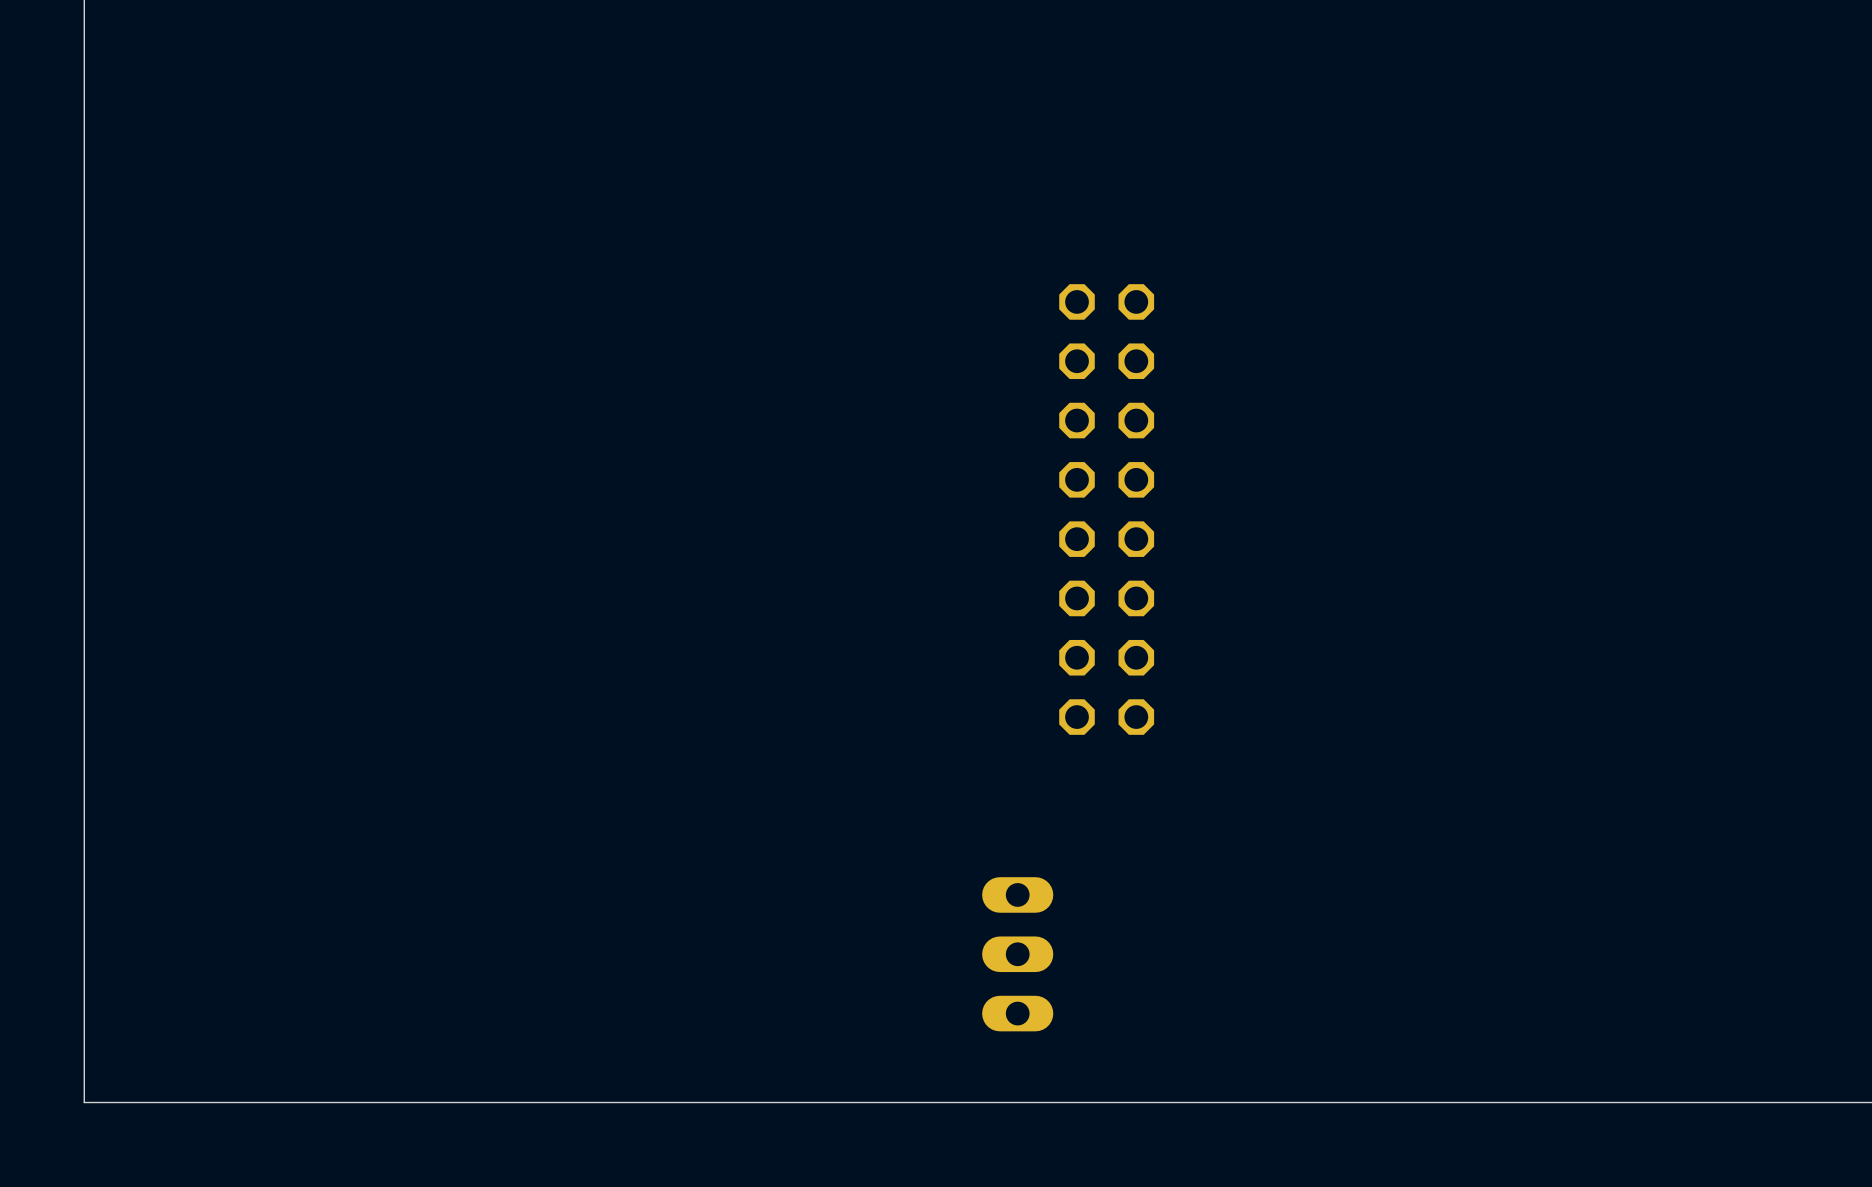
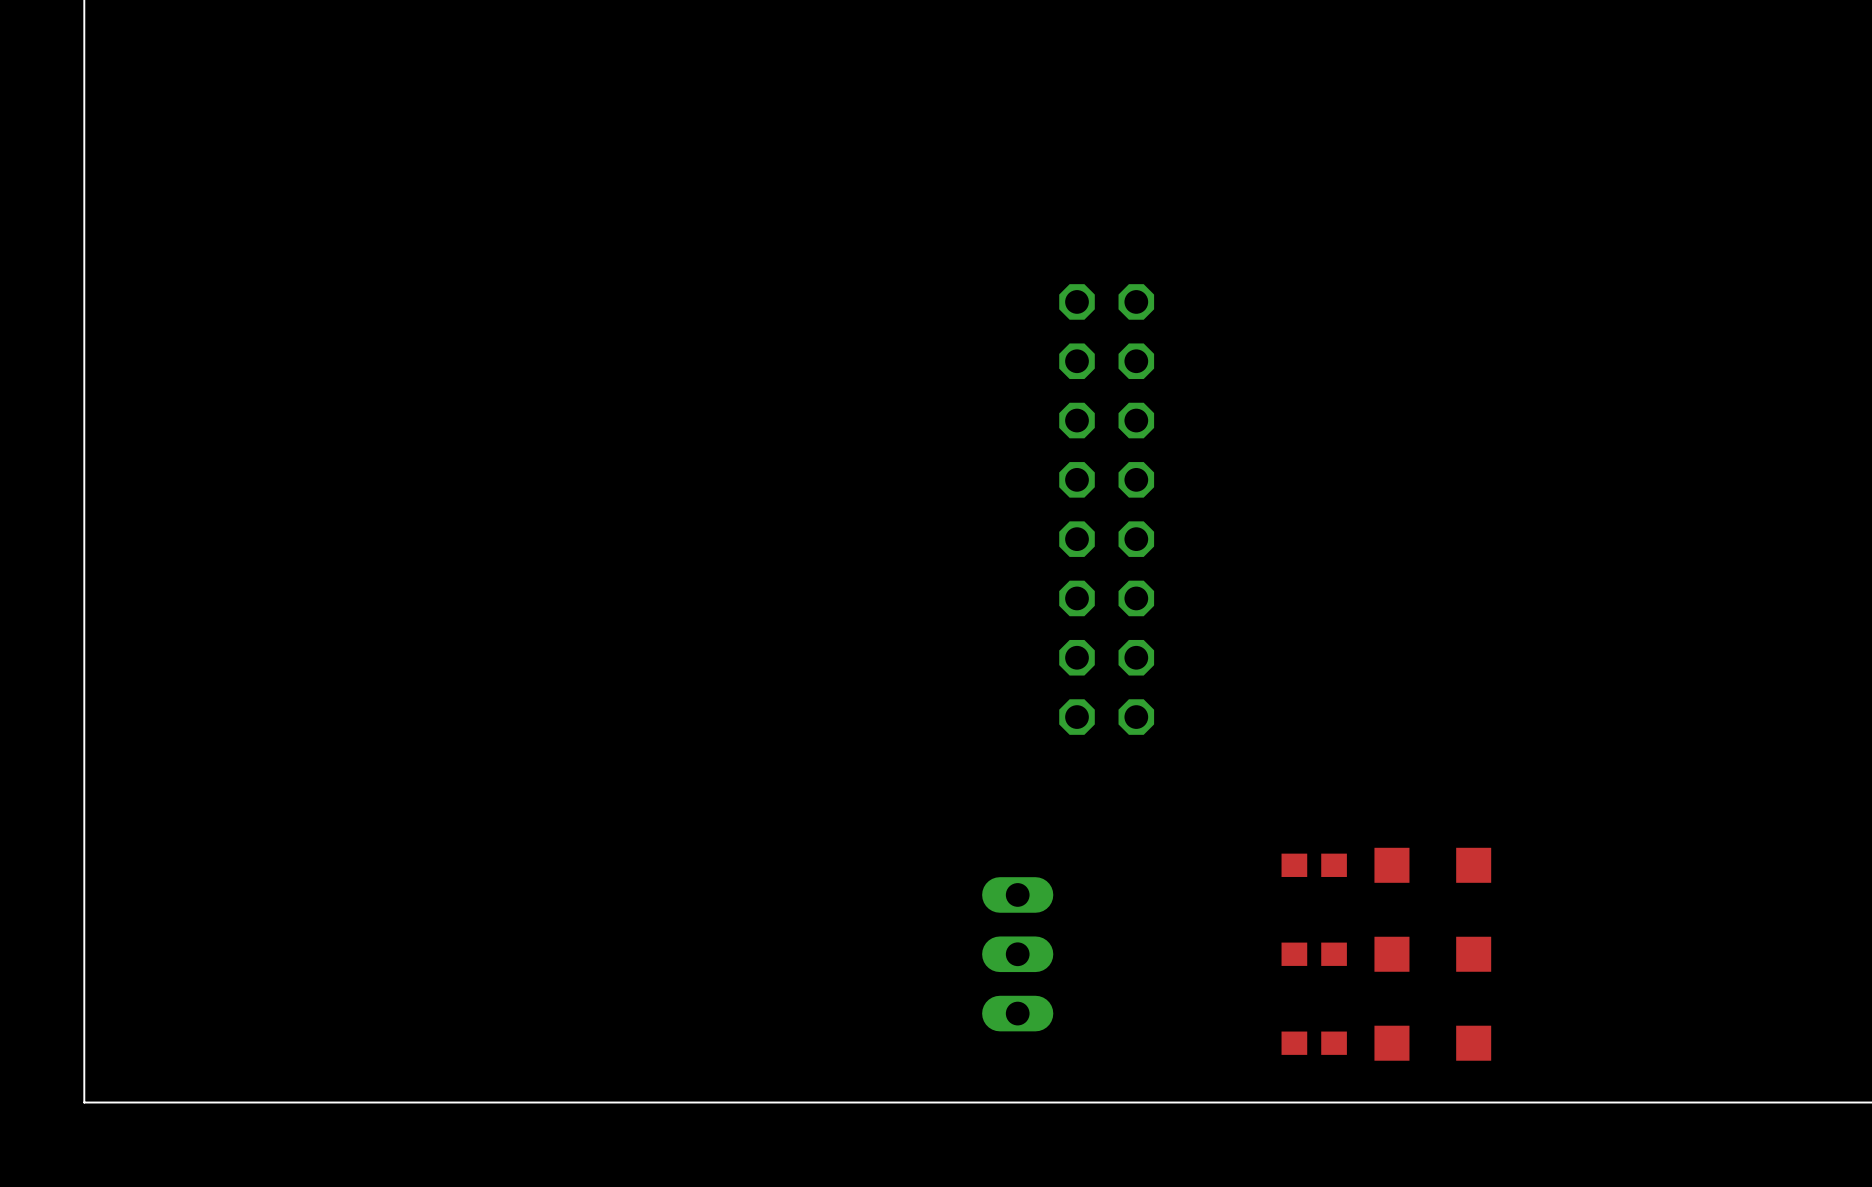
part: none -> (1314, 865)
part: none -> (1432, 865)
part: none -> (1314, 954)
part: none -> (1432, 954)
part: none -> (1314, 1043)
part: none -> (1432, 1043)

